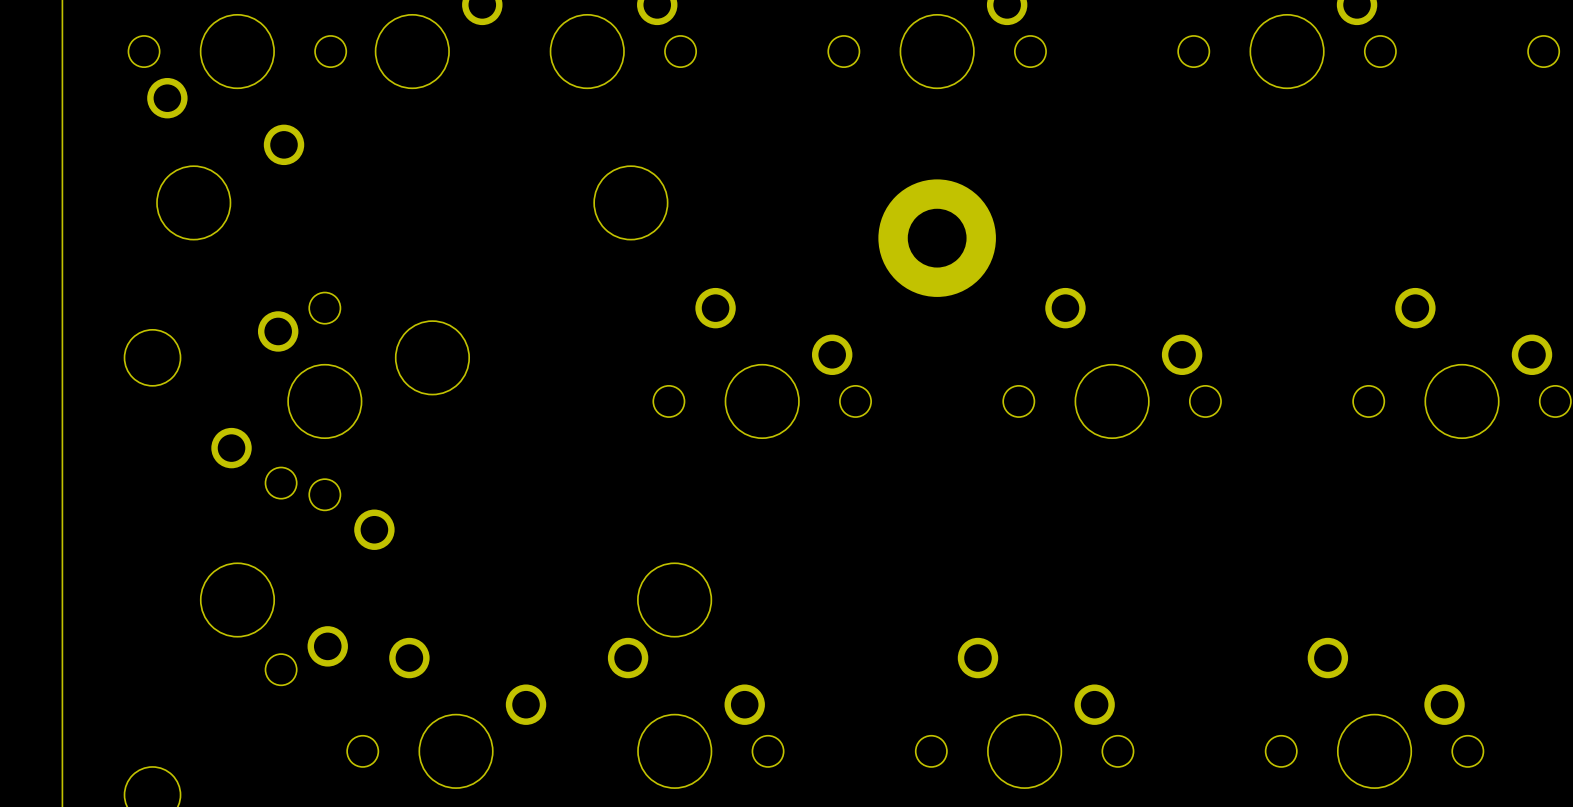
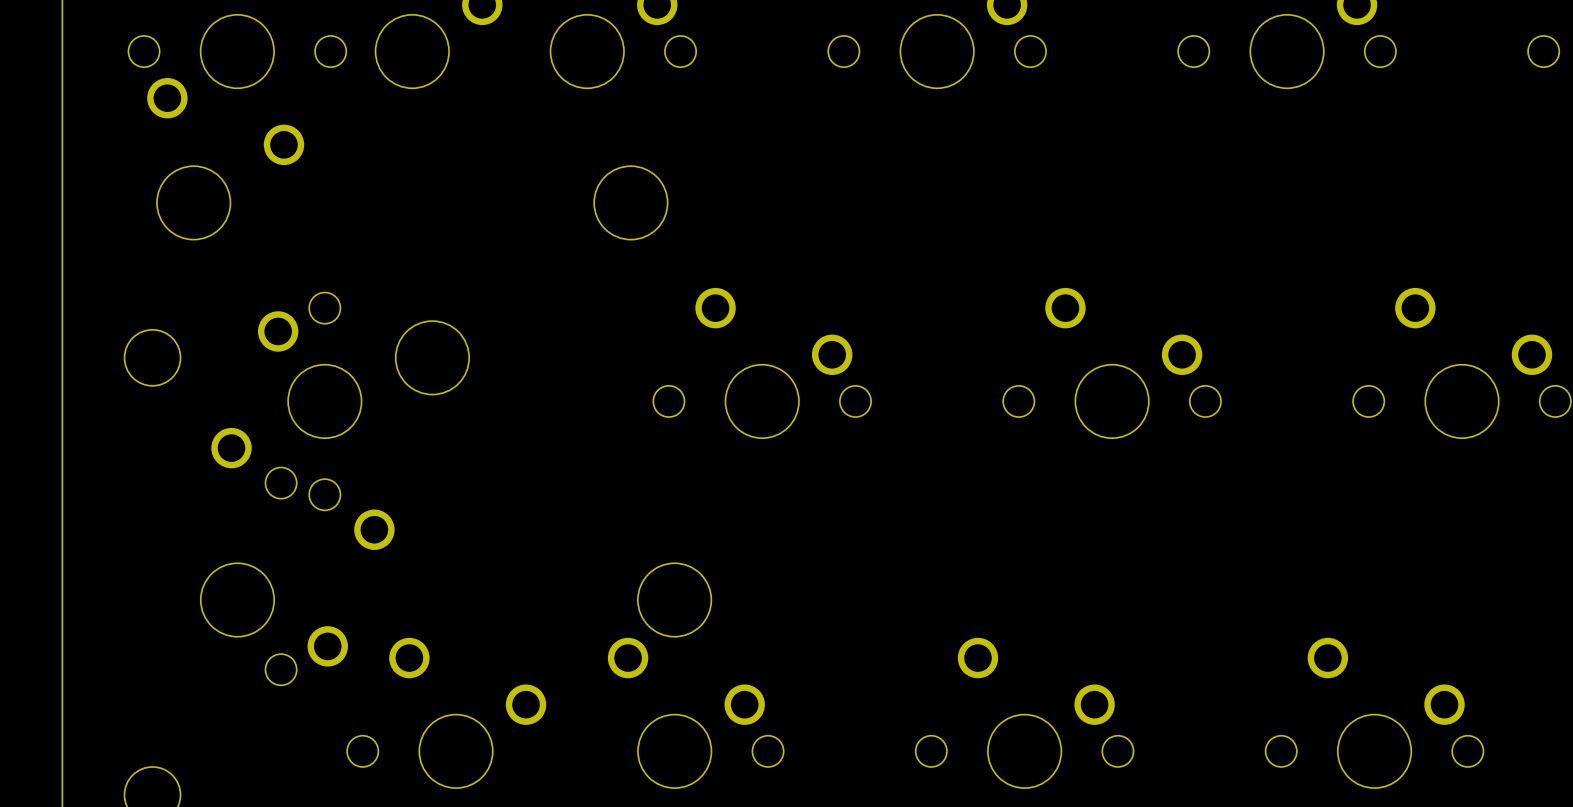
part: (937, 238) -> none

